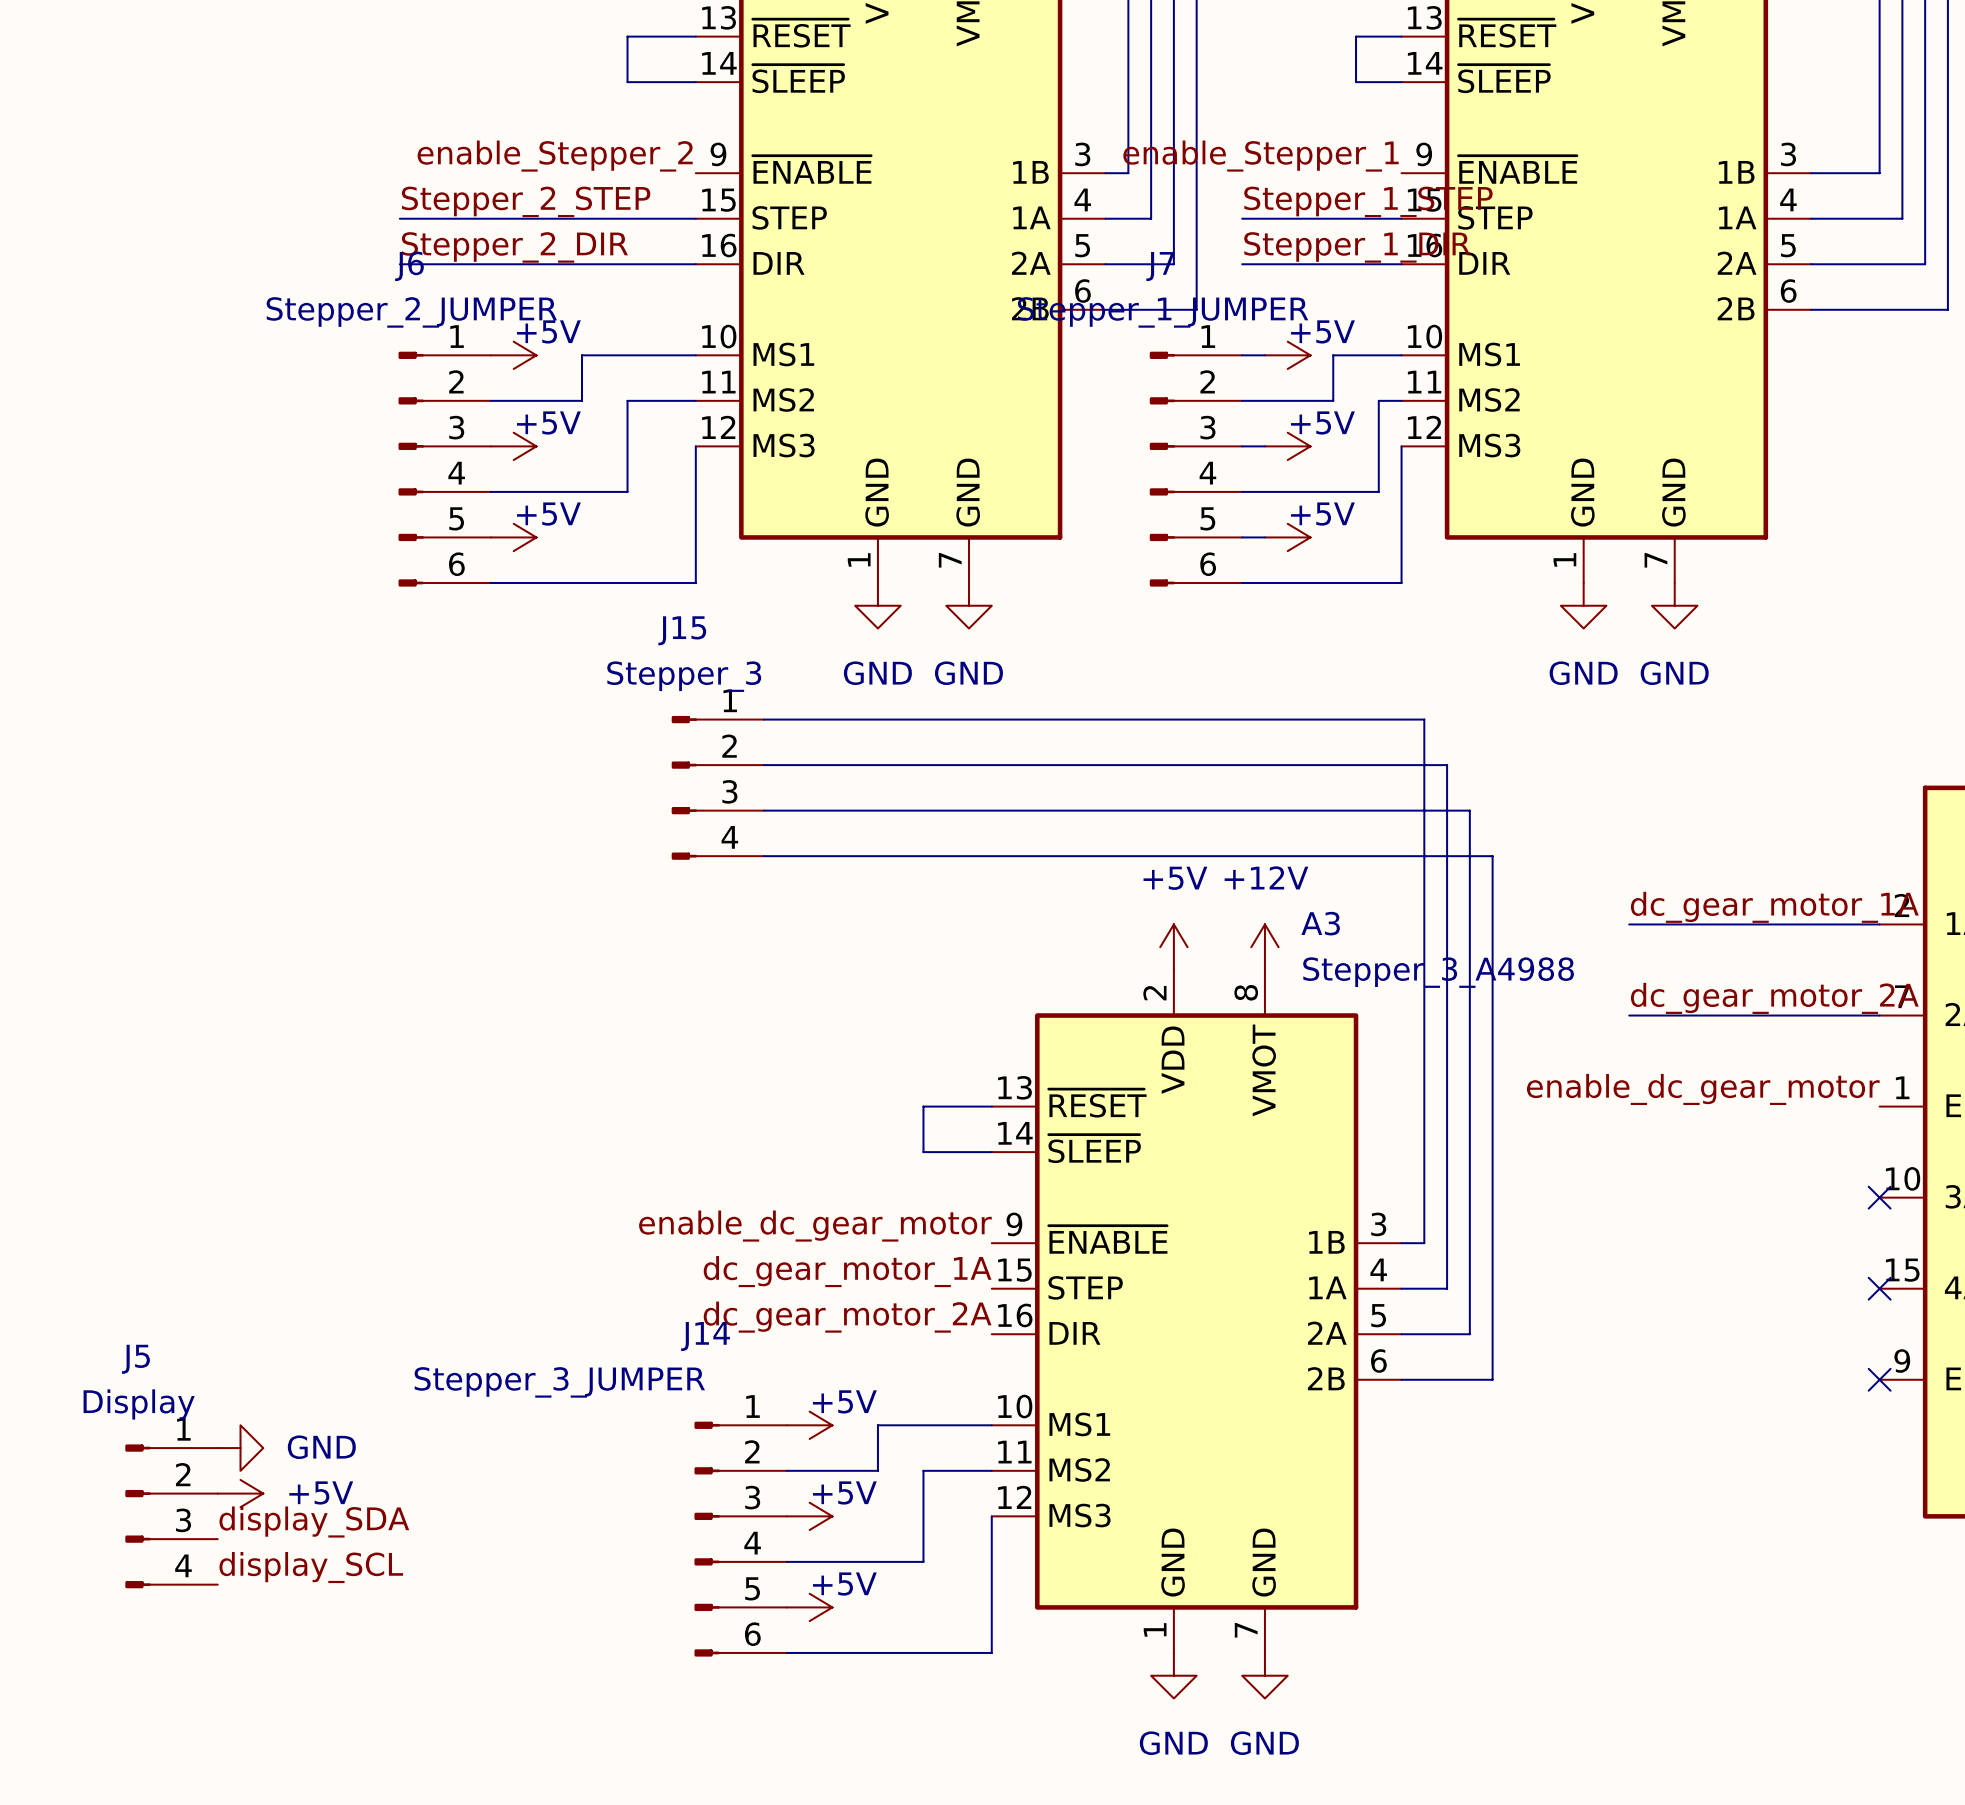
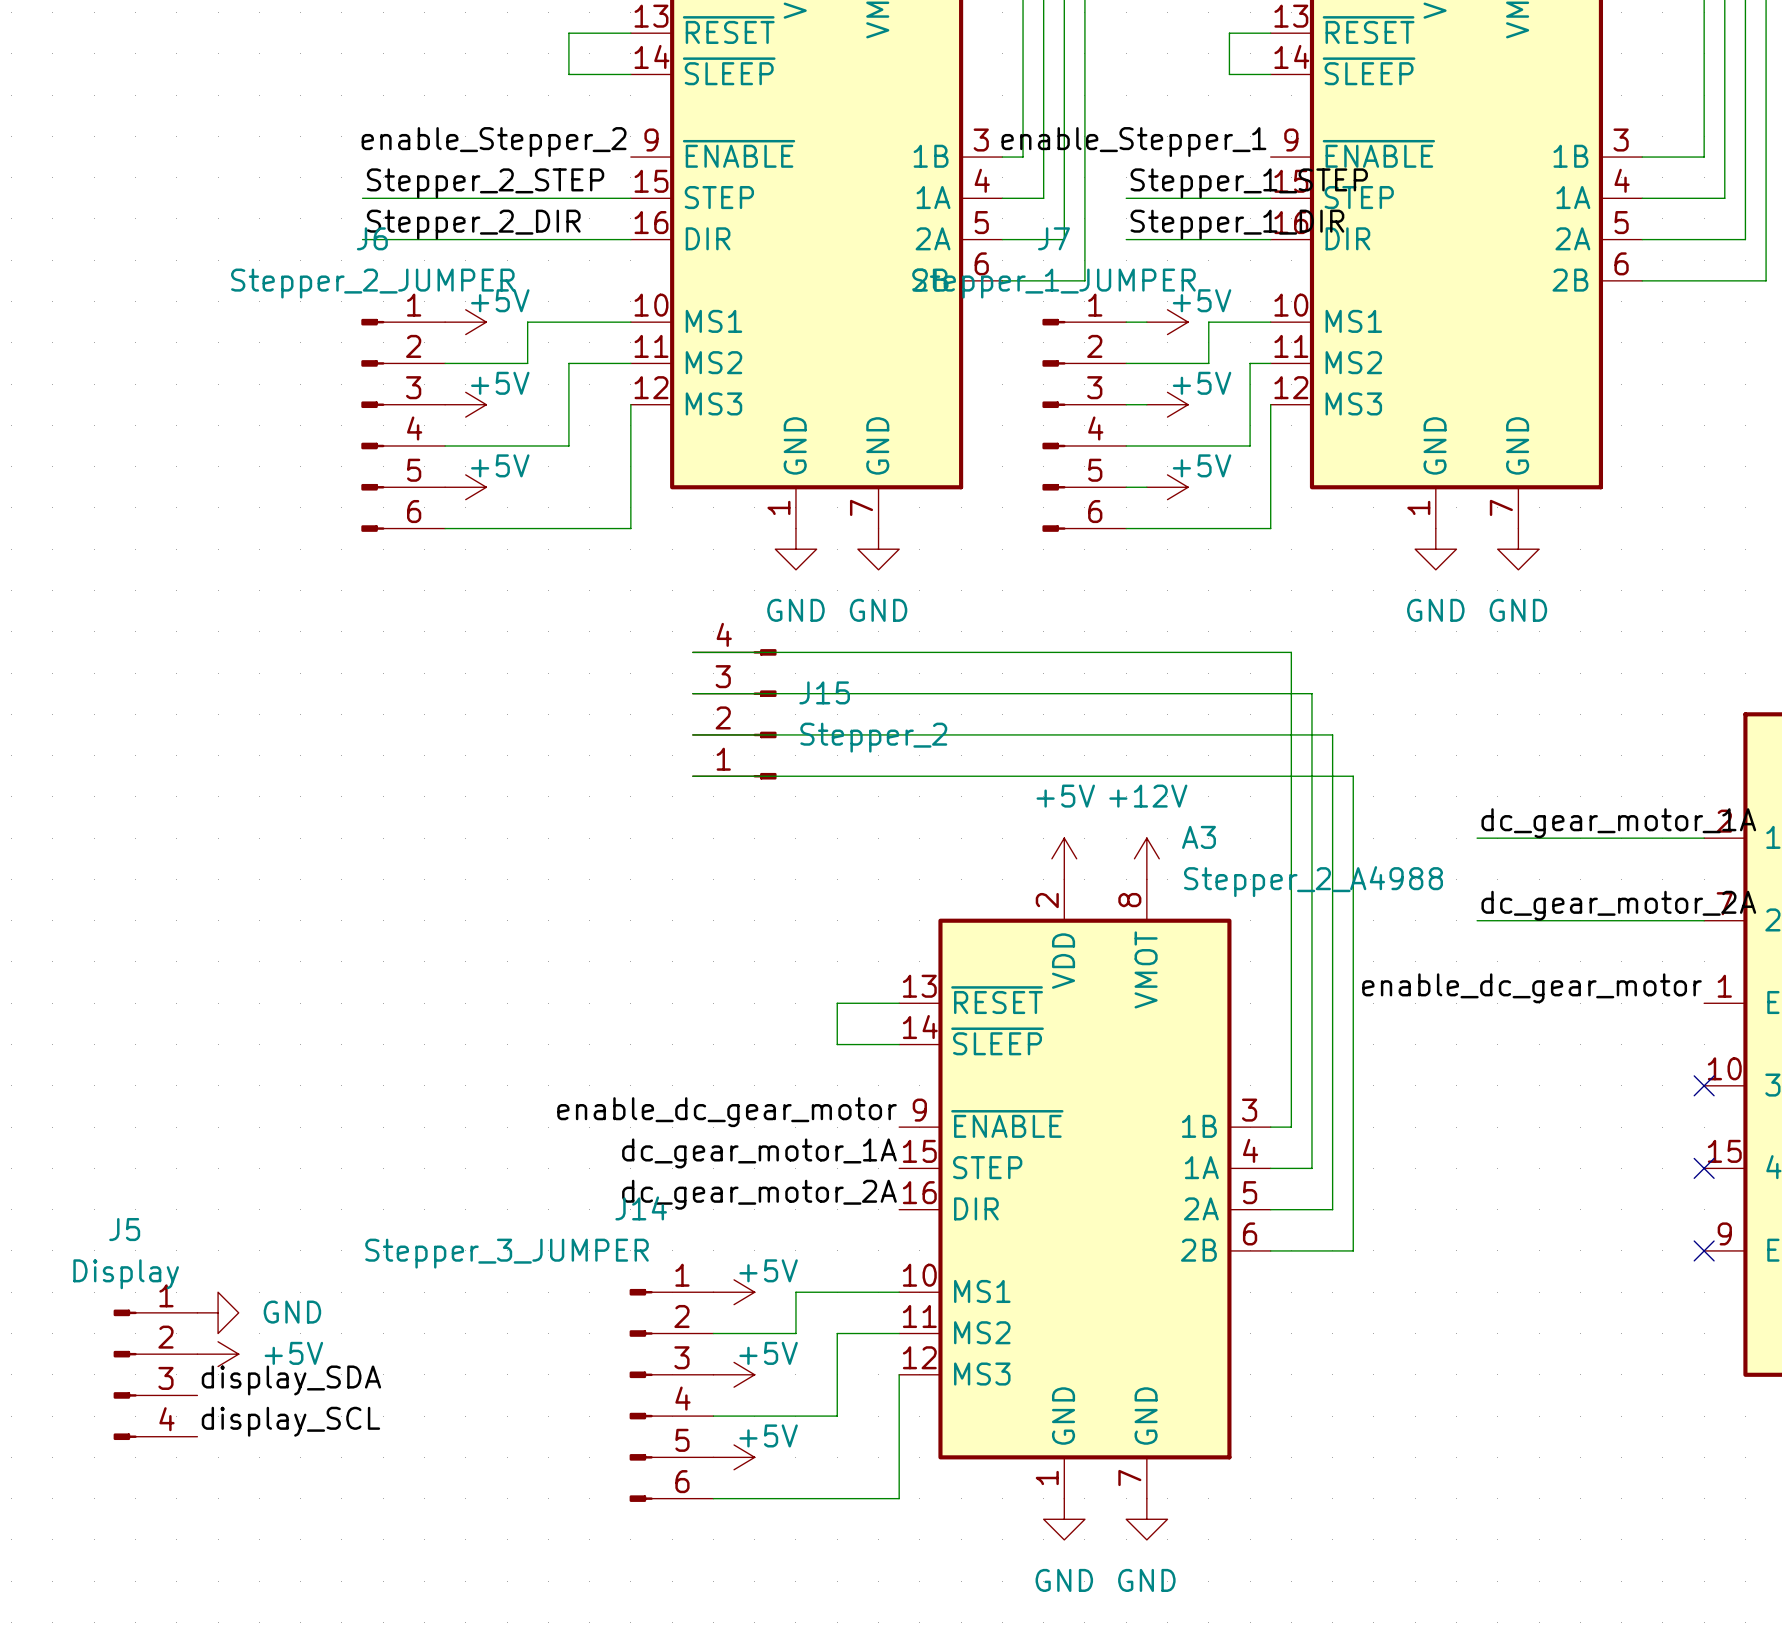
J15 name position: J15 (682, 630) -> J15 (824, 692)
J15 value: Stepper_3 (684, 676) -> Stepper_2 (873, 737)
J15 rotation: 0° (684, 787) -> 180° (765, 714)
J15 position: (717, 787) -> (734, 714)
A3 value: Stepper_3_A4988 (1438, 972) -> Stepper_2_A4988 (1313, 881)

